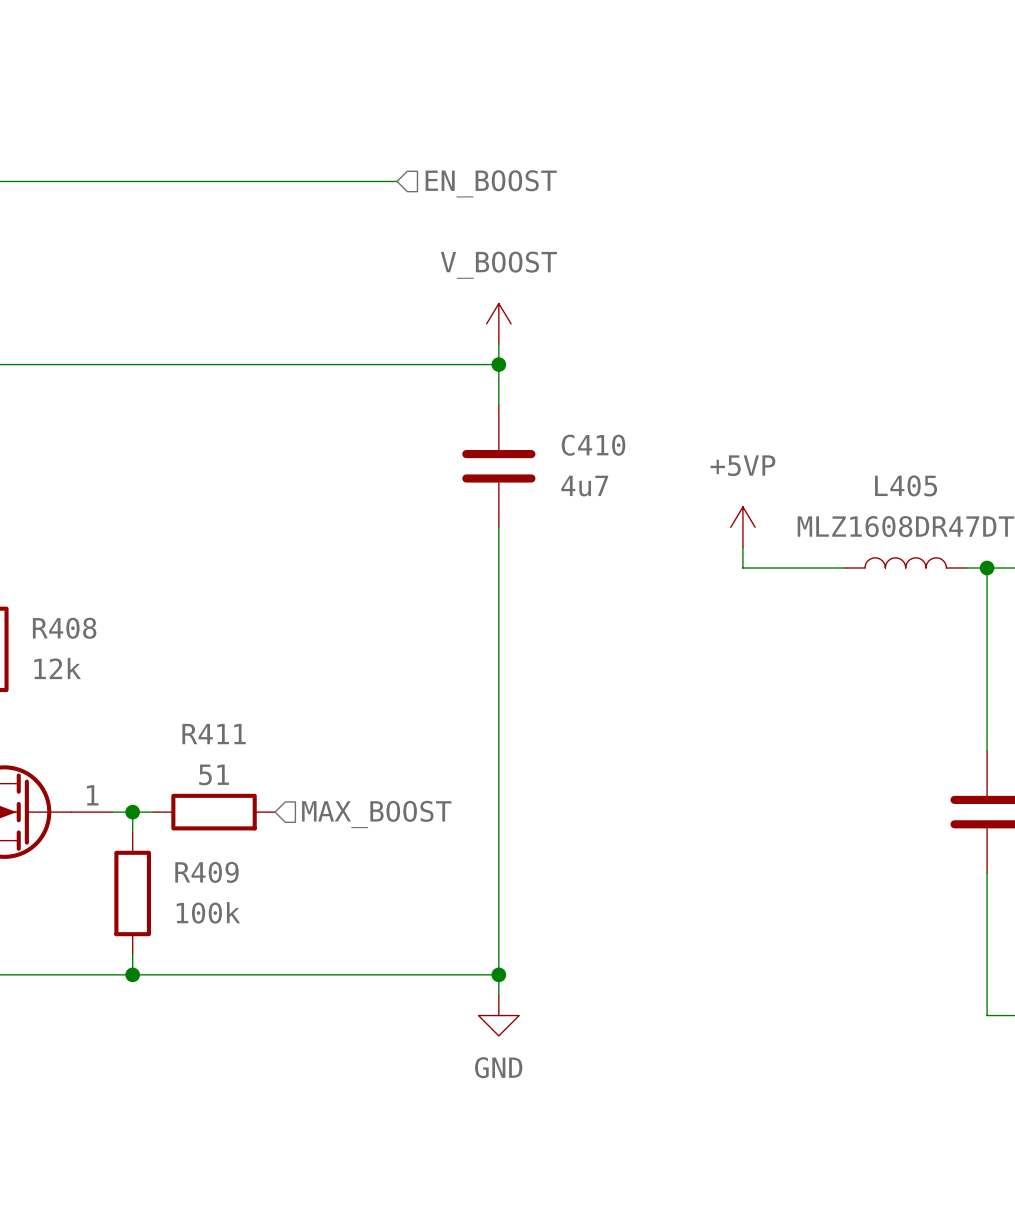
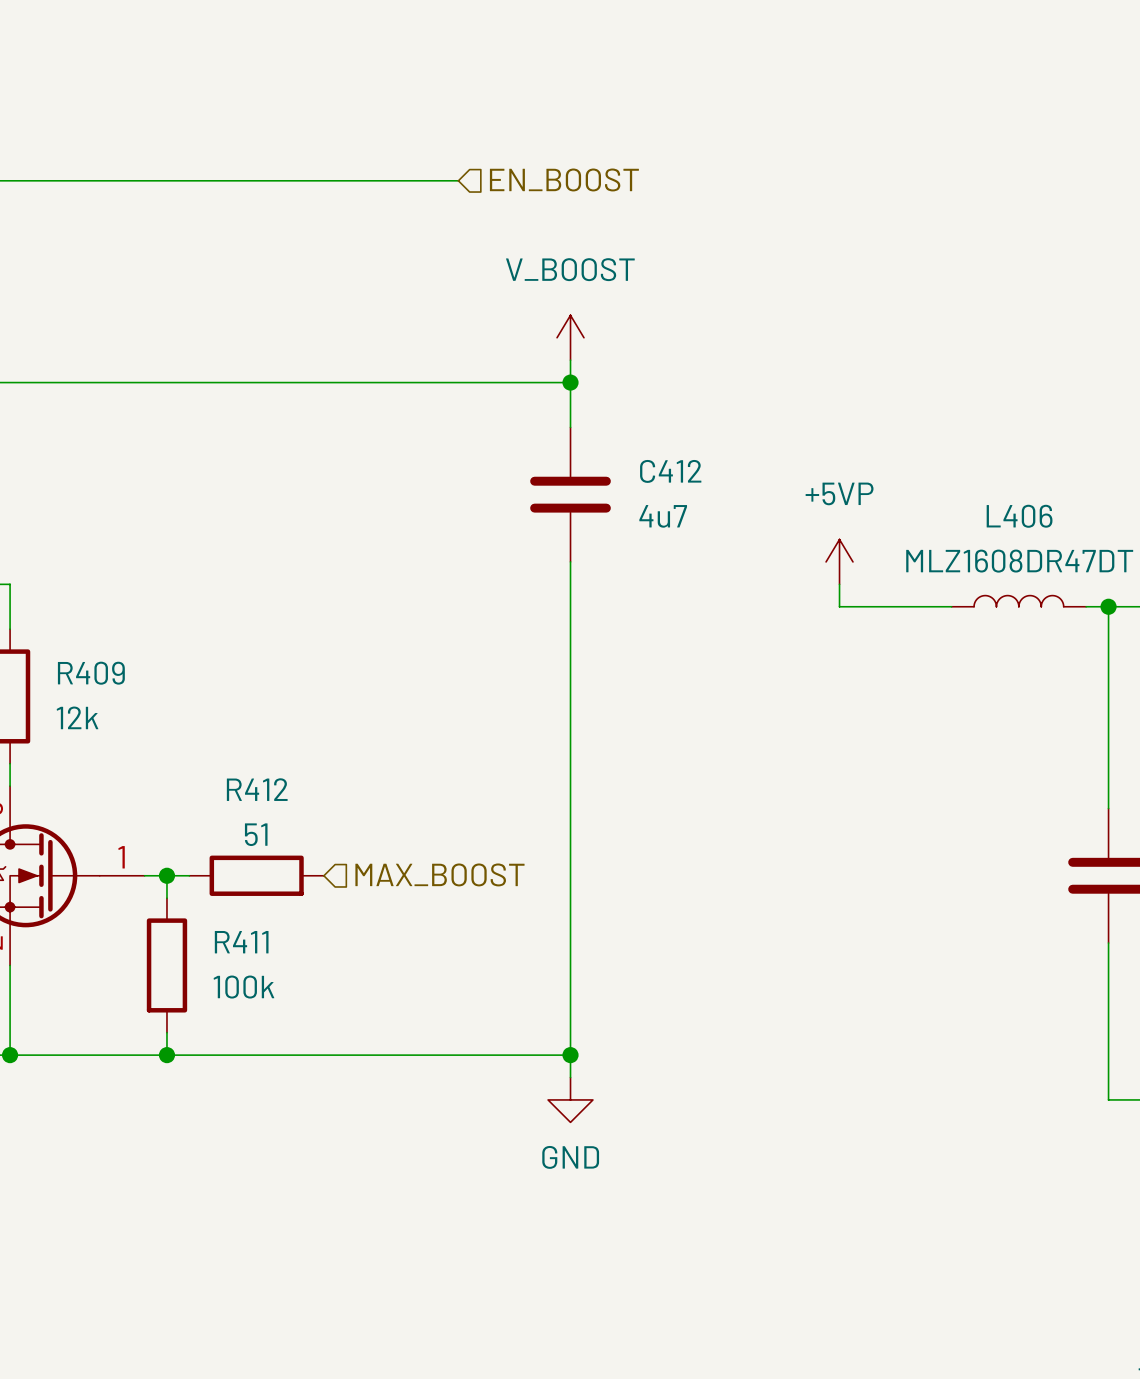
C410 name: C410 (593, 445) -> C412 (670, 471)
L405 name: L405 (906, 485) -> L406 (1019, 516)
R408 name: R408 (64, 628) -> R409 (91, 673)
R411 name: R411 (214, 734) -> R412 (257, 789)
R409 name: R409 (206, 872) -> R411 (241, 942)

